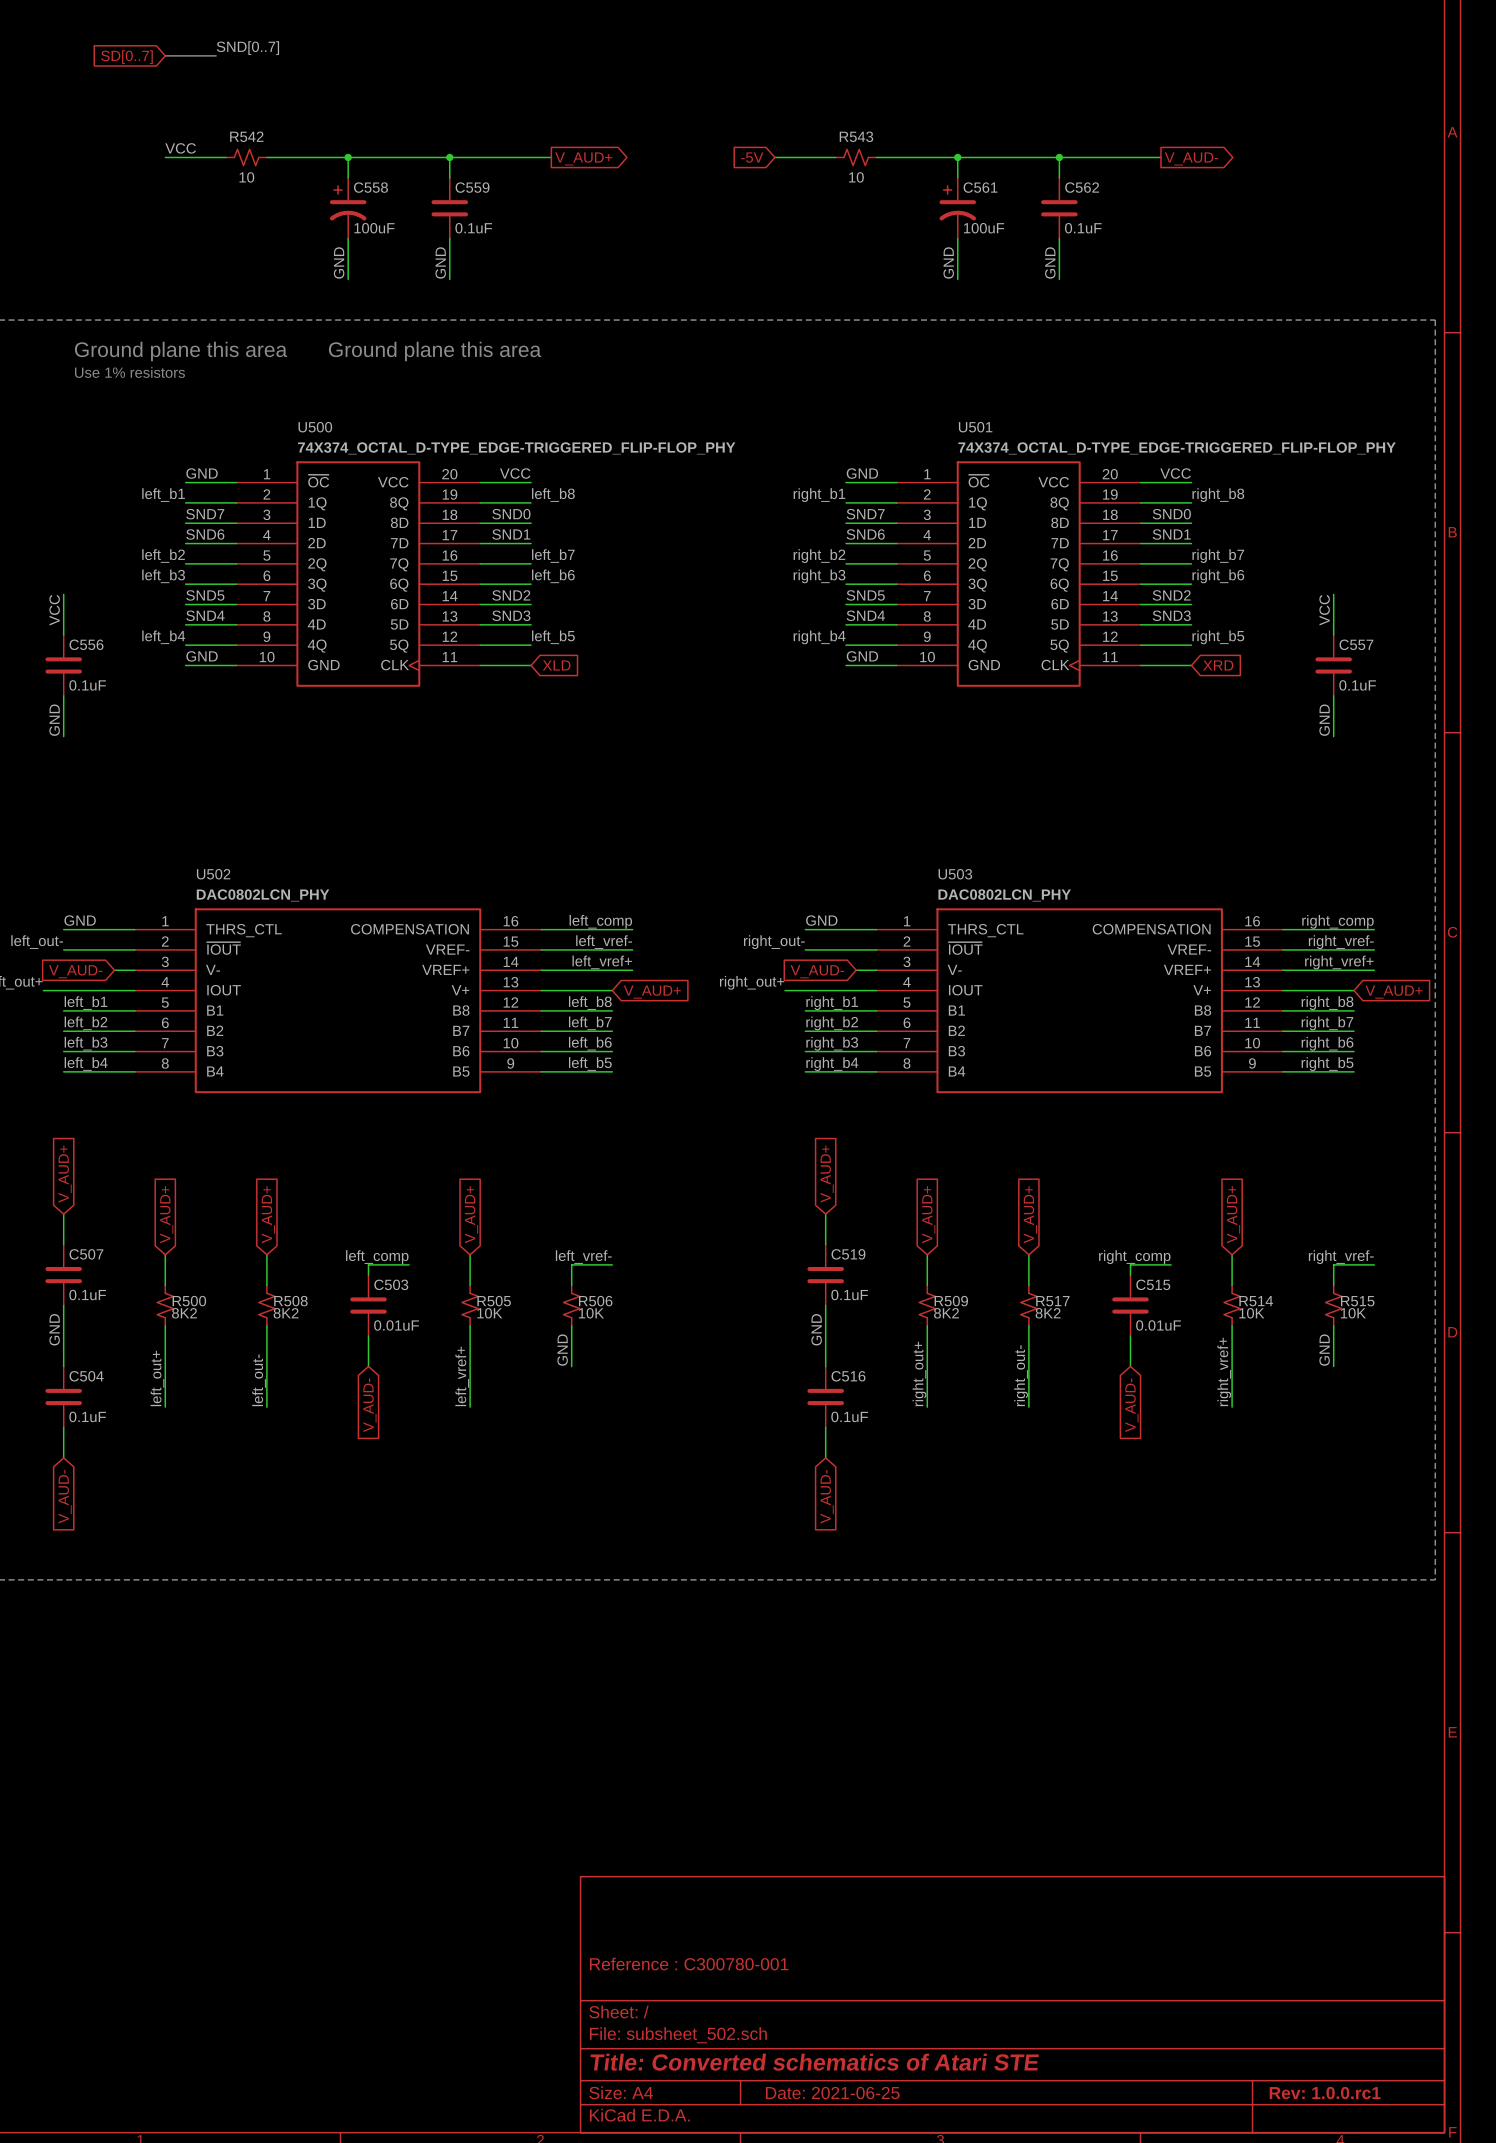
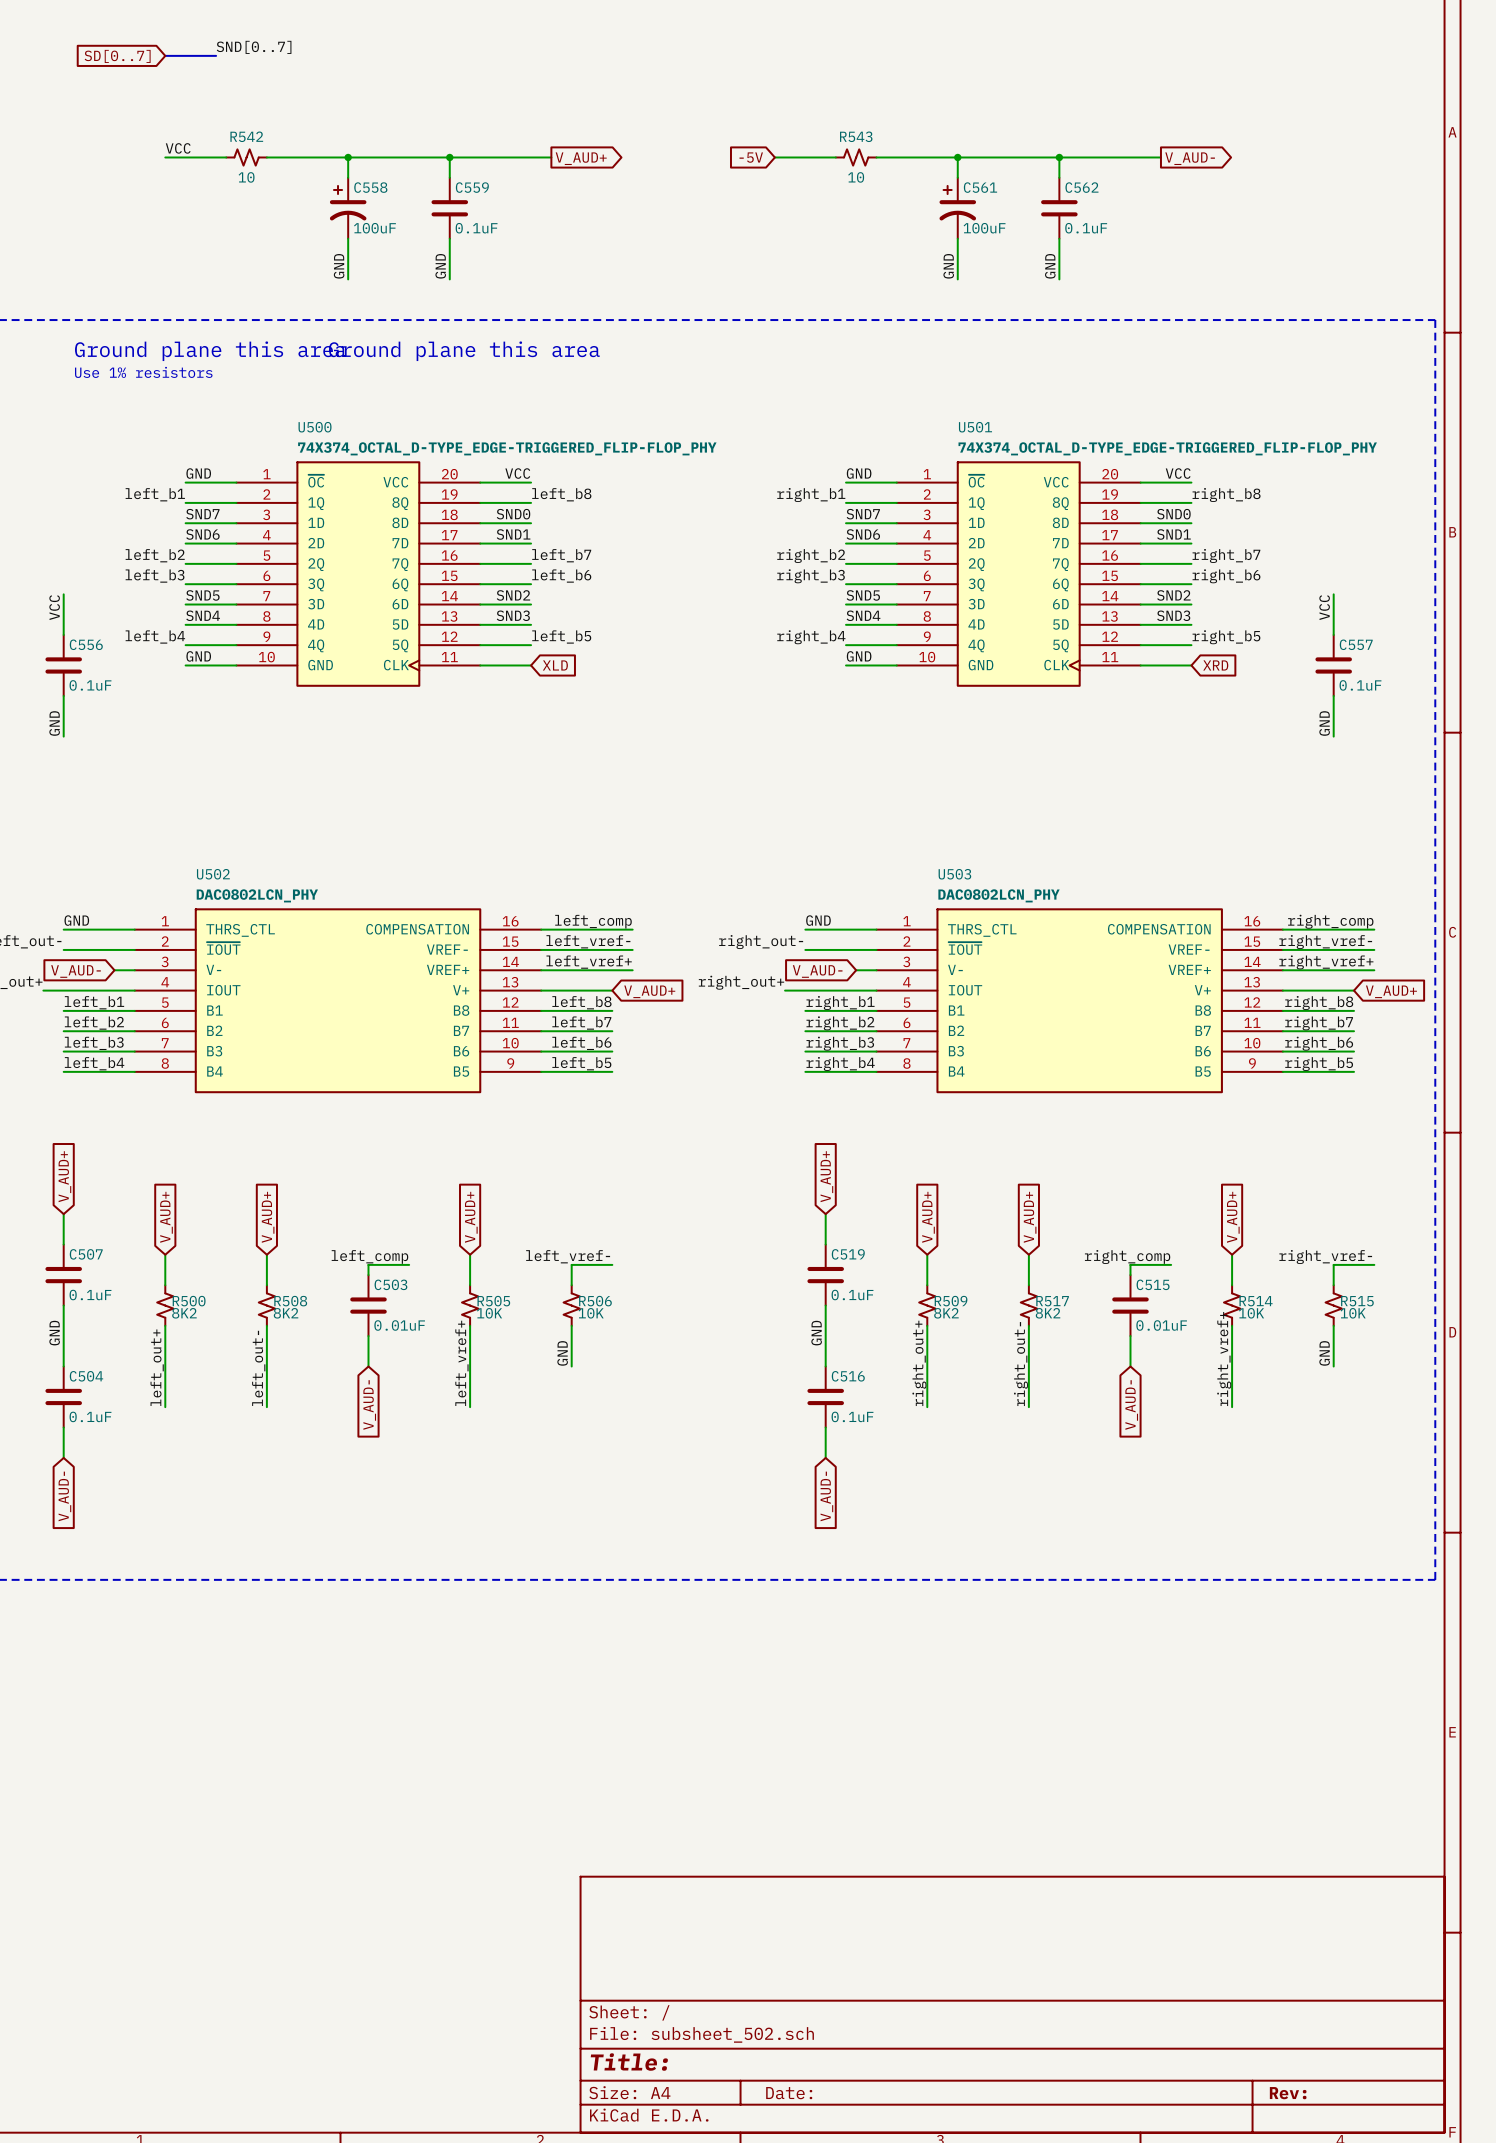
title block: Reference : C300780-001 (689, 1964) -> none
title block: Title: Converted schematics of Atari STE (814, 2062) -> Title: (629, 2062)
title block: Date: 2021-06-25 (832, 2093) -> Date: (789, 2093)
title block: Rev: 1.0.0.rc1 (1325, 2093) -> Rev: (1288, 2093)

